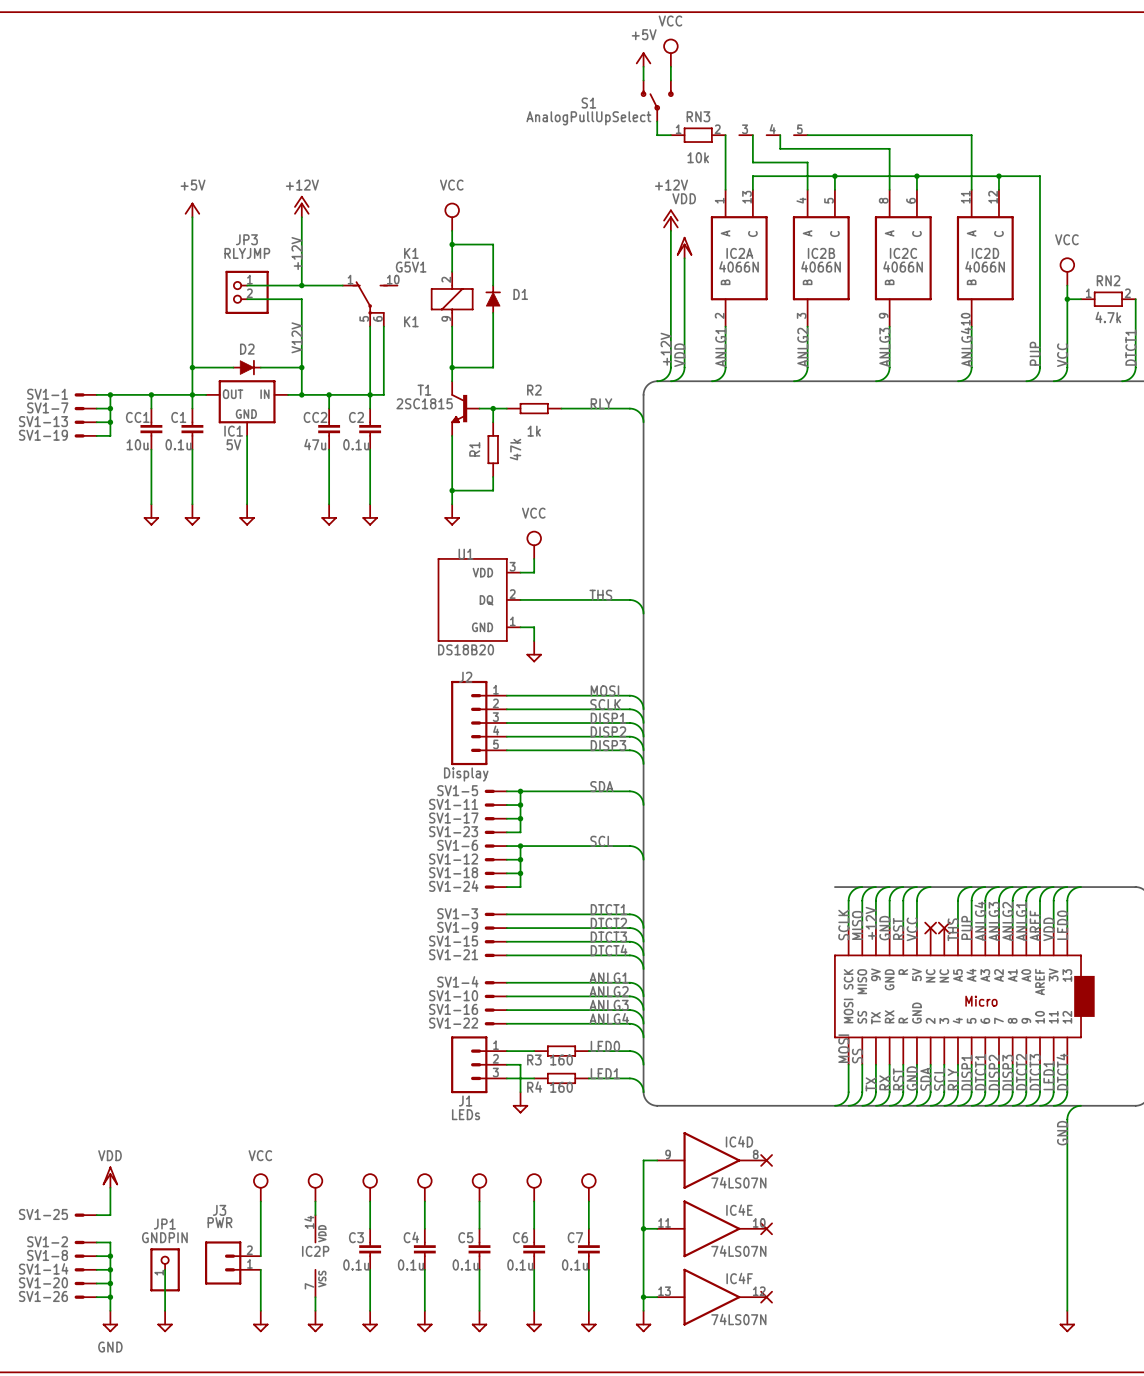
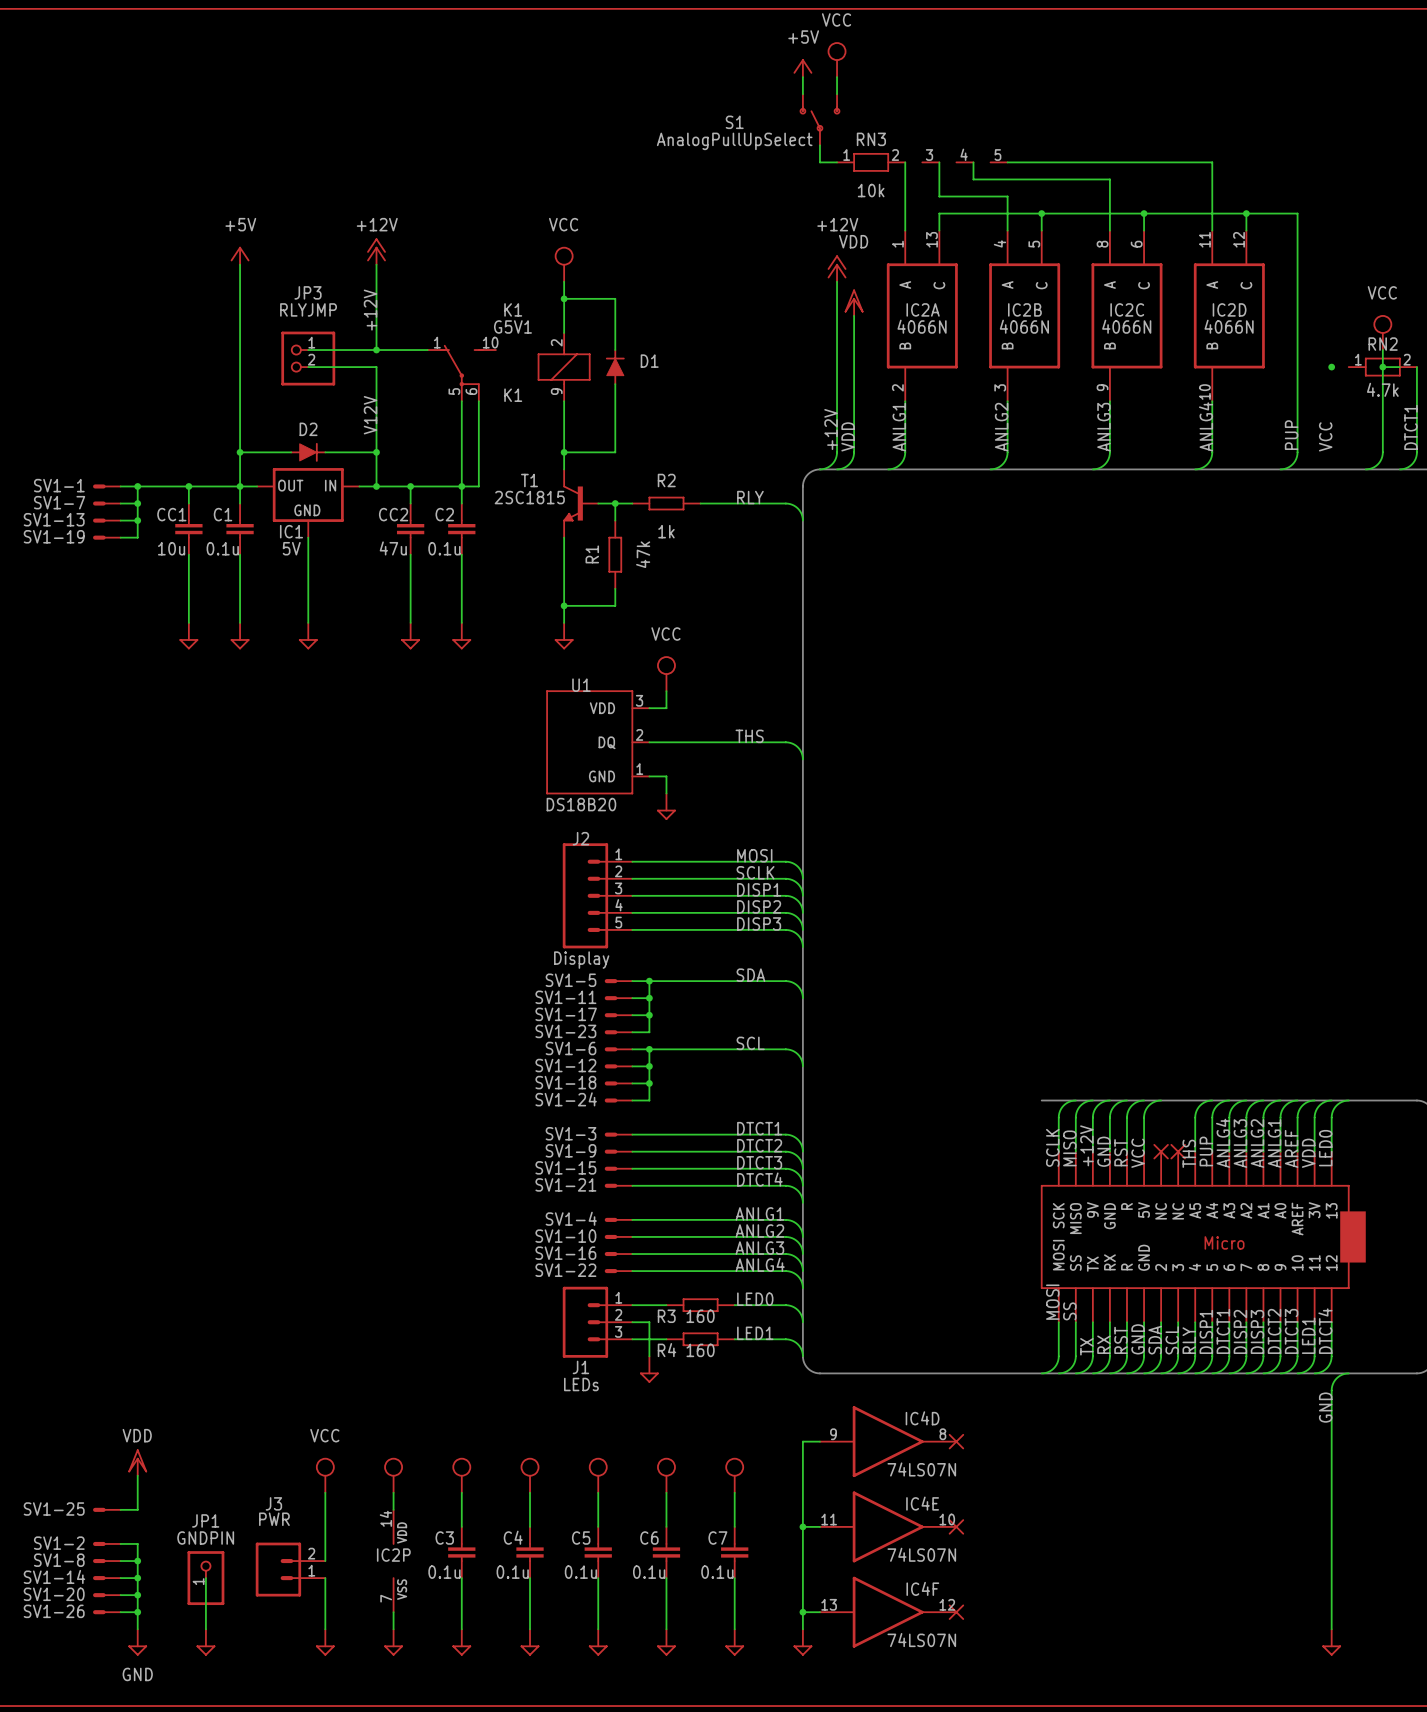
power symbol position: VCC (1067, 271) -> VCC (1382, 332)
wire: (1067, 285) (1067, 369) (1061, 378) (1053, 381) -> (1382, 350) (1382, 454) (1376, 465) (1365, 469)
wire: (1067, 299) (1081, 299) -> (1382, 367) (1399, 367)
junction: none -> (1382, 367)

